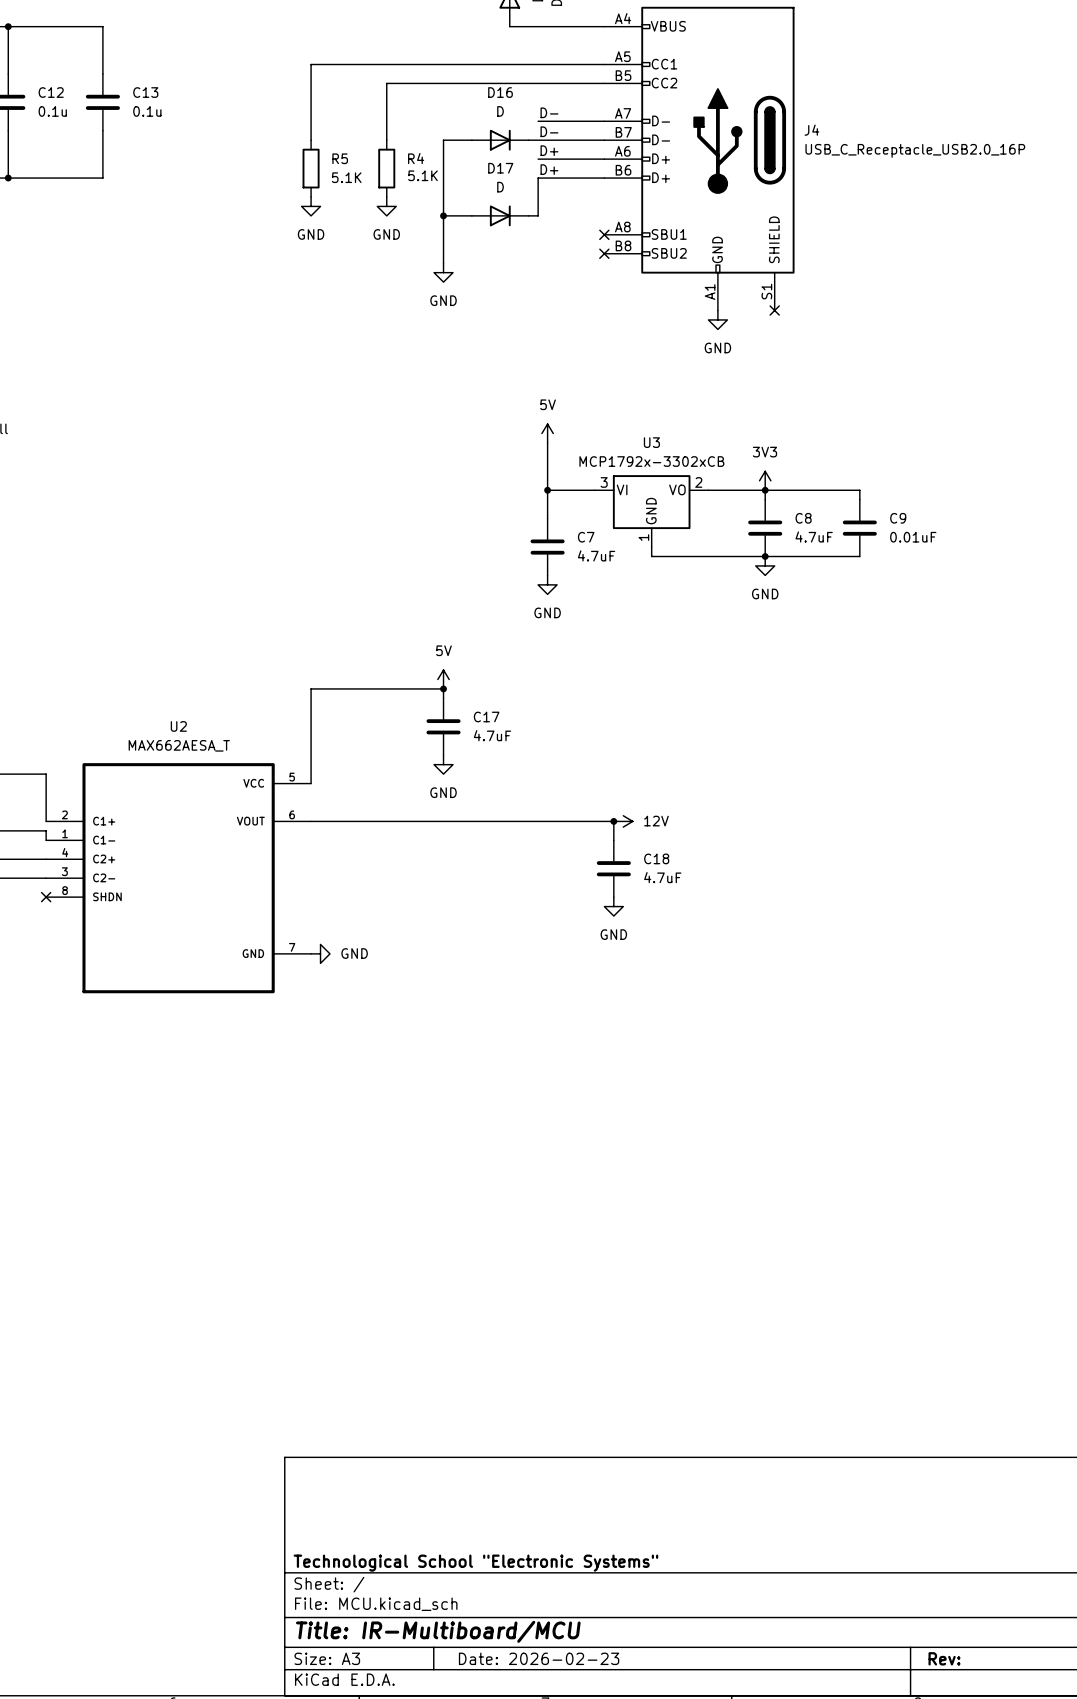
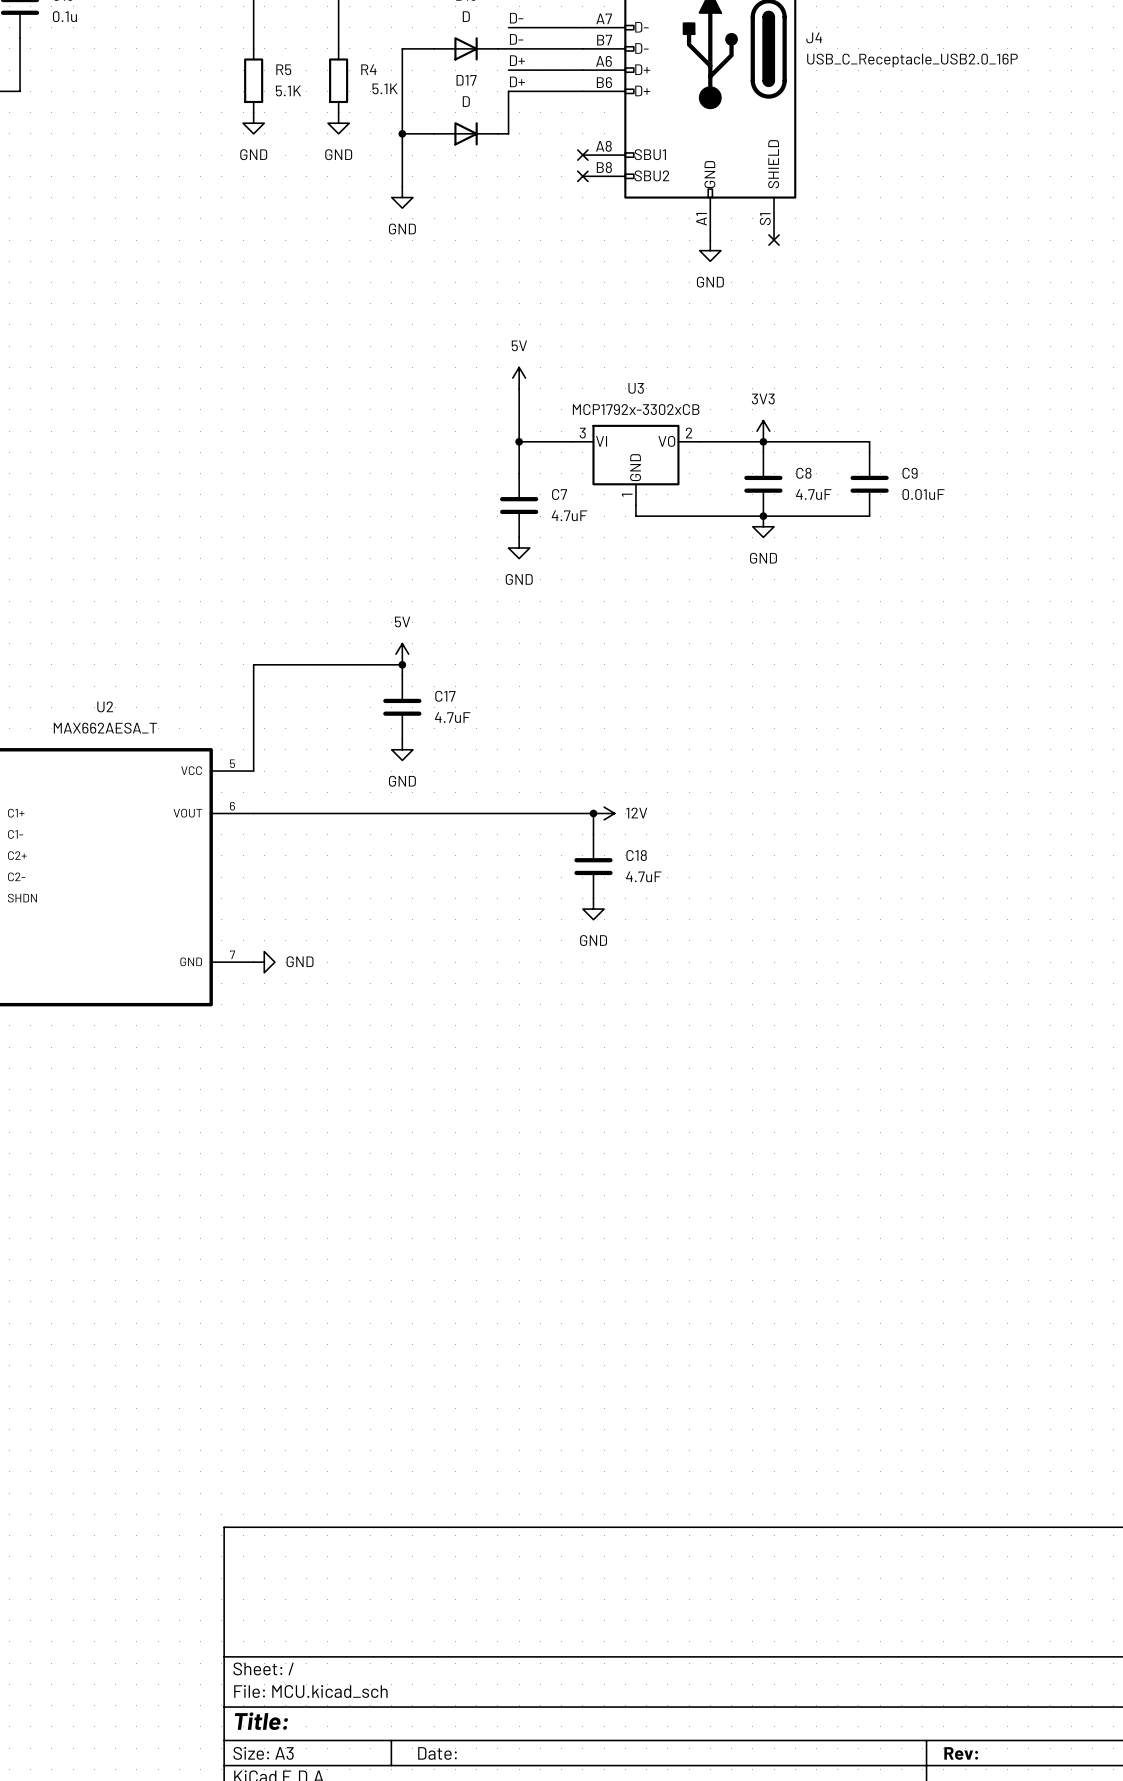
title block: Technological School "Electronic Systems" (475, 1563) -> none
title block: Title: IR-Multiboard/MCU (438, 1631) -> Title: (261, 1721)
title block: Date: 2026-02-23 (539, 1658) -> Date: (437, 1753)

